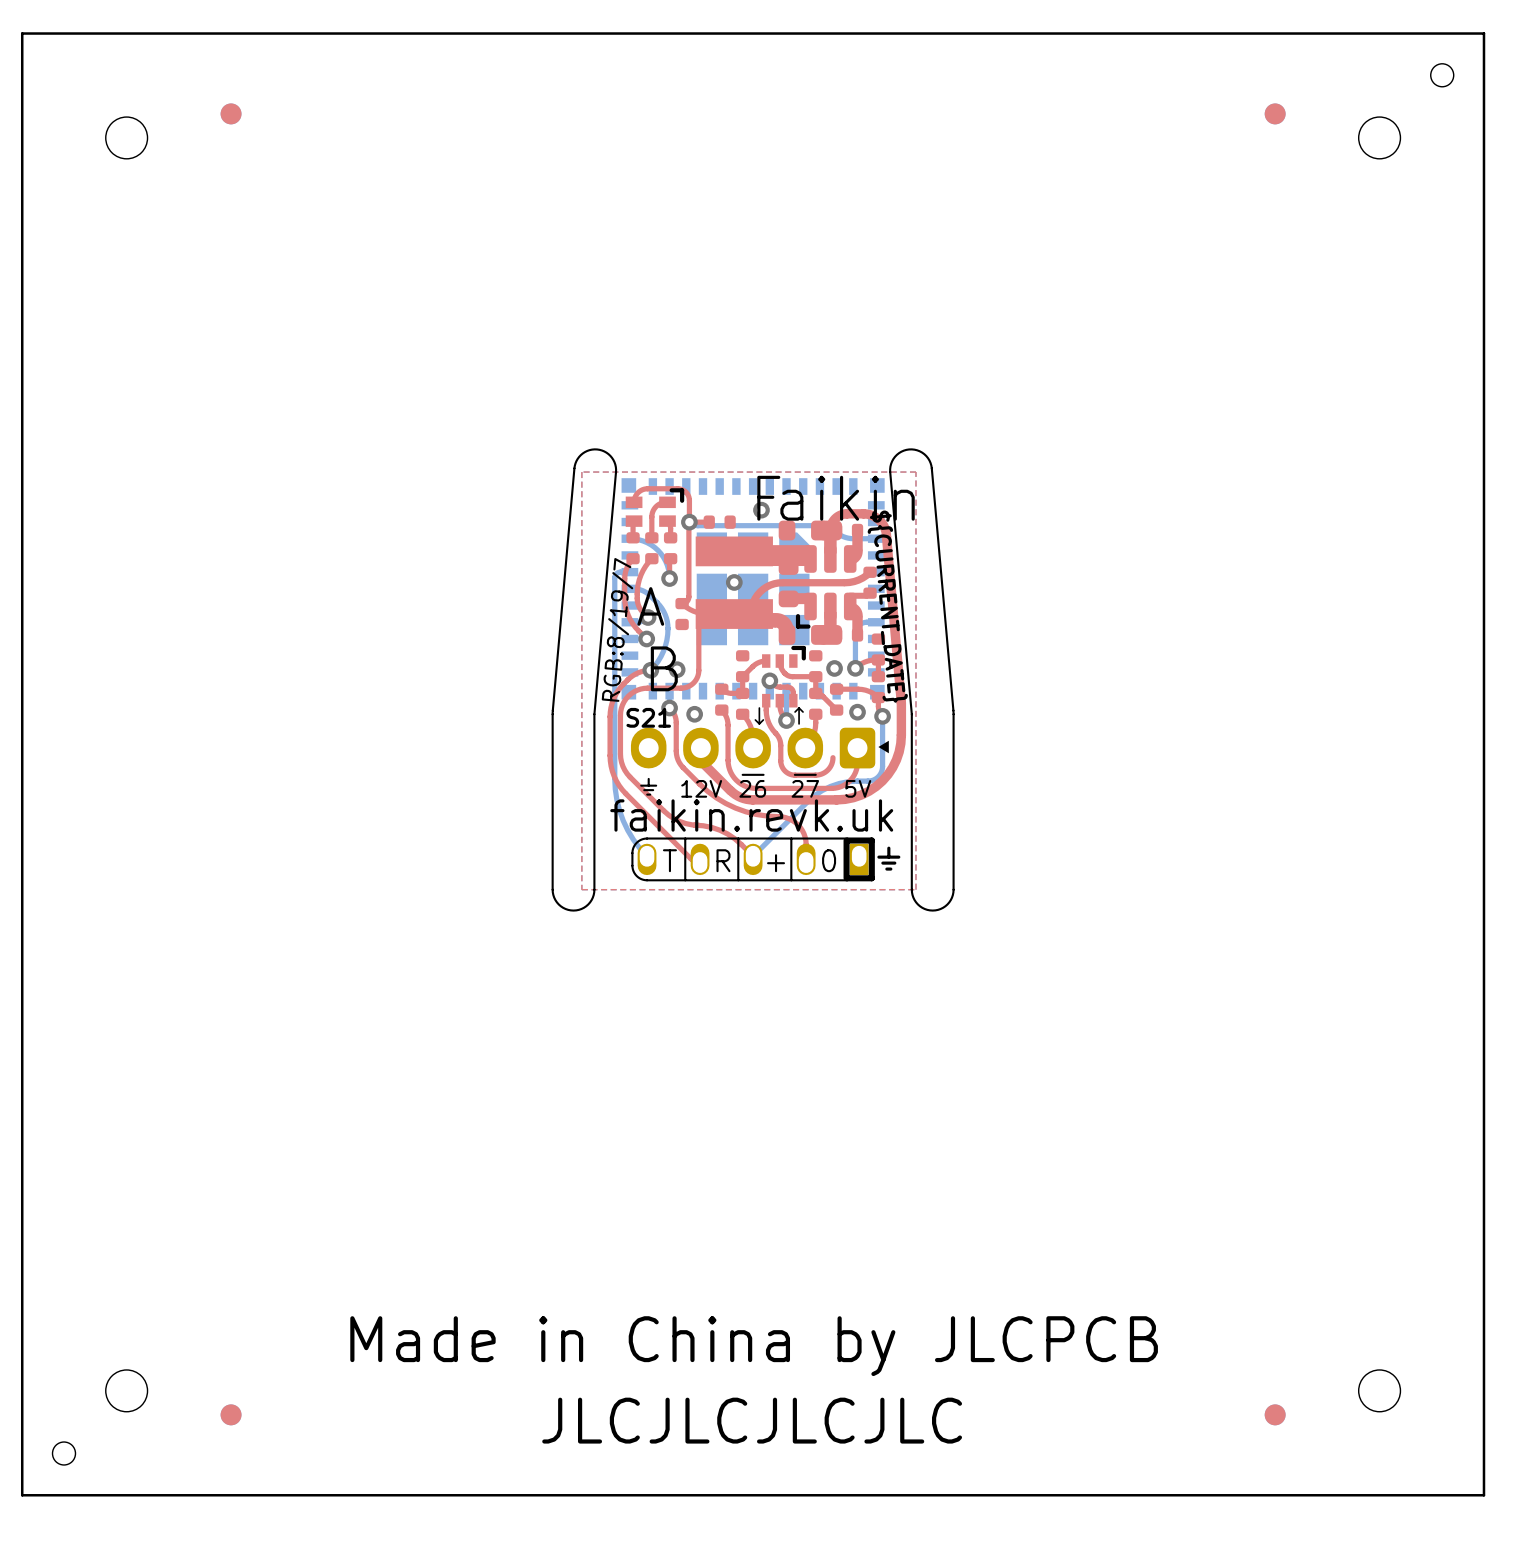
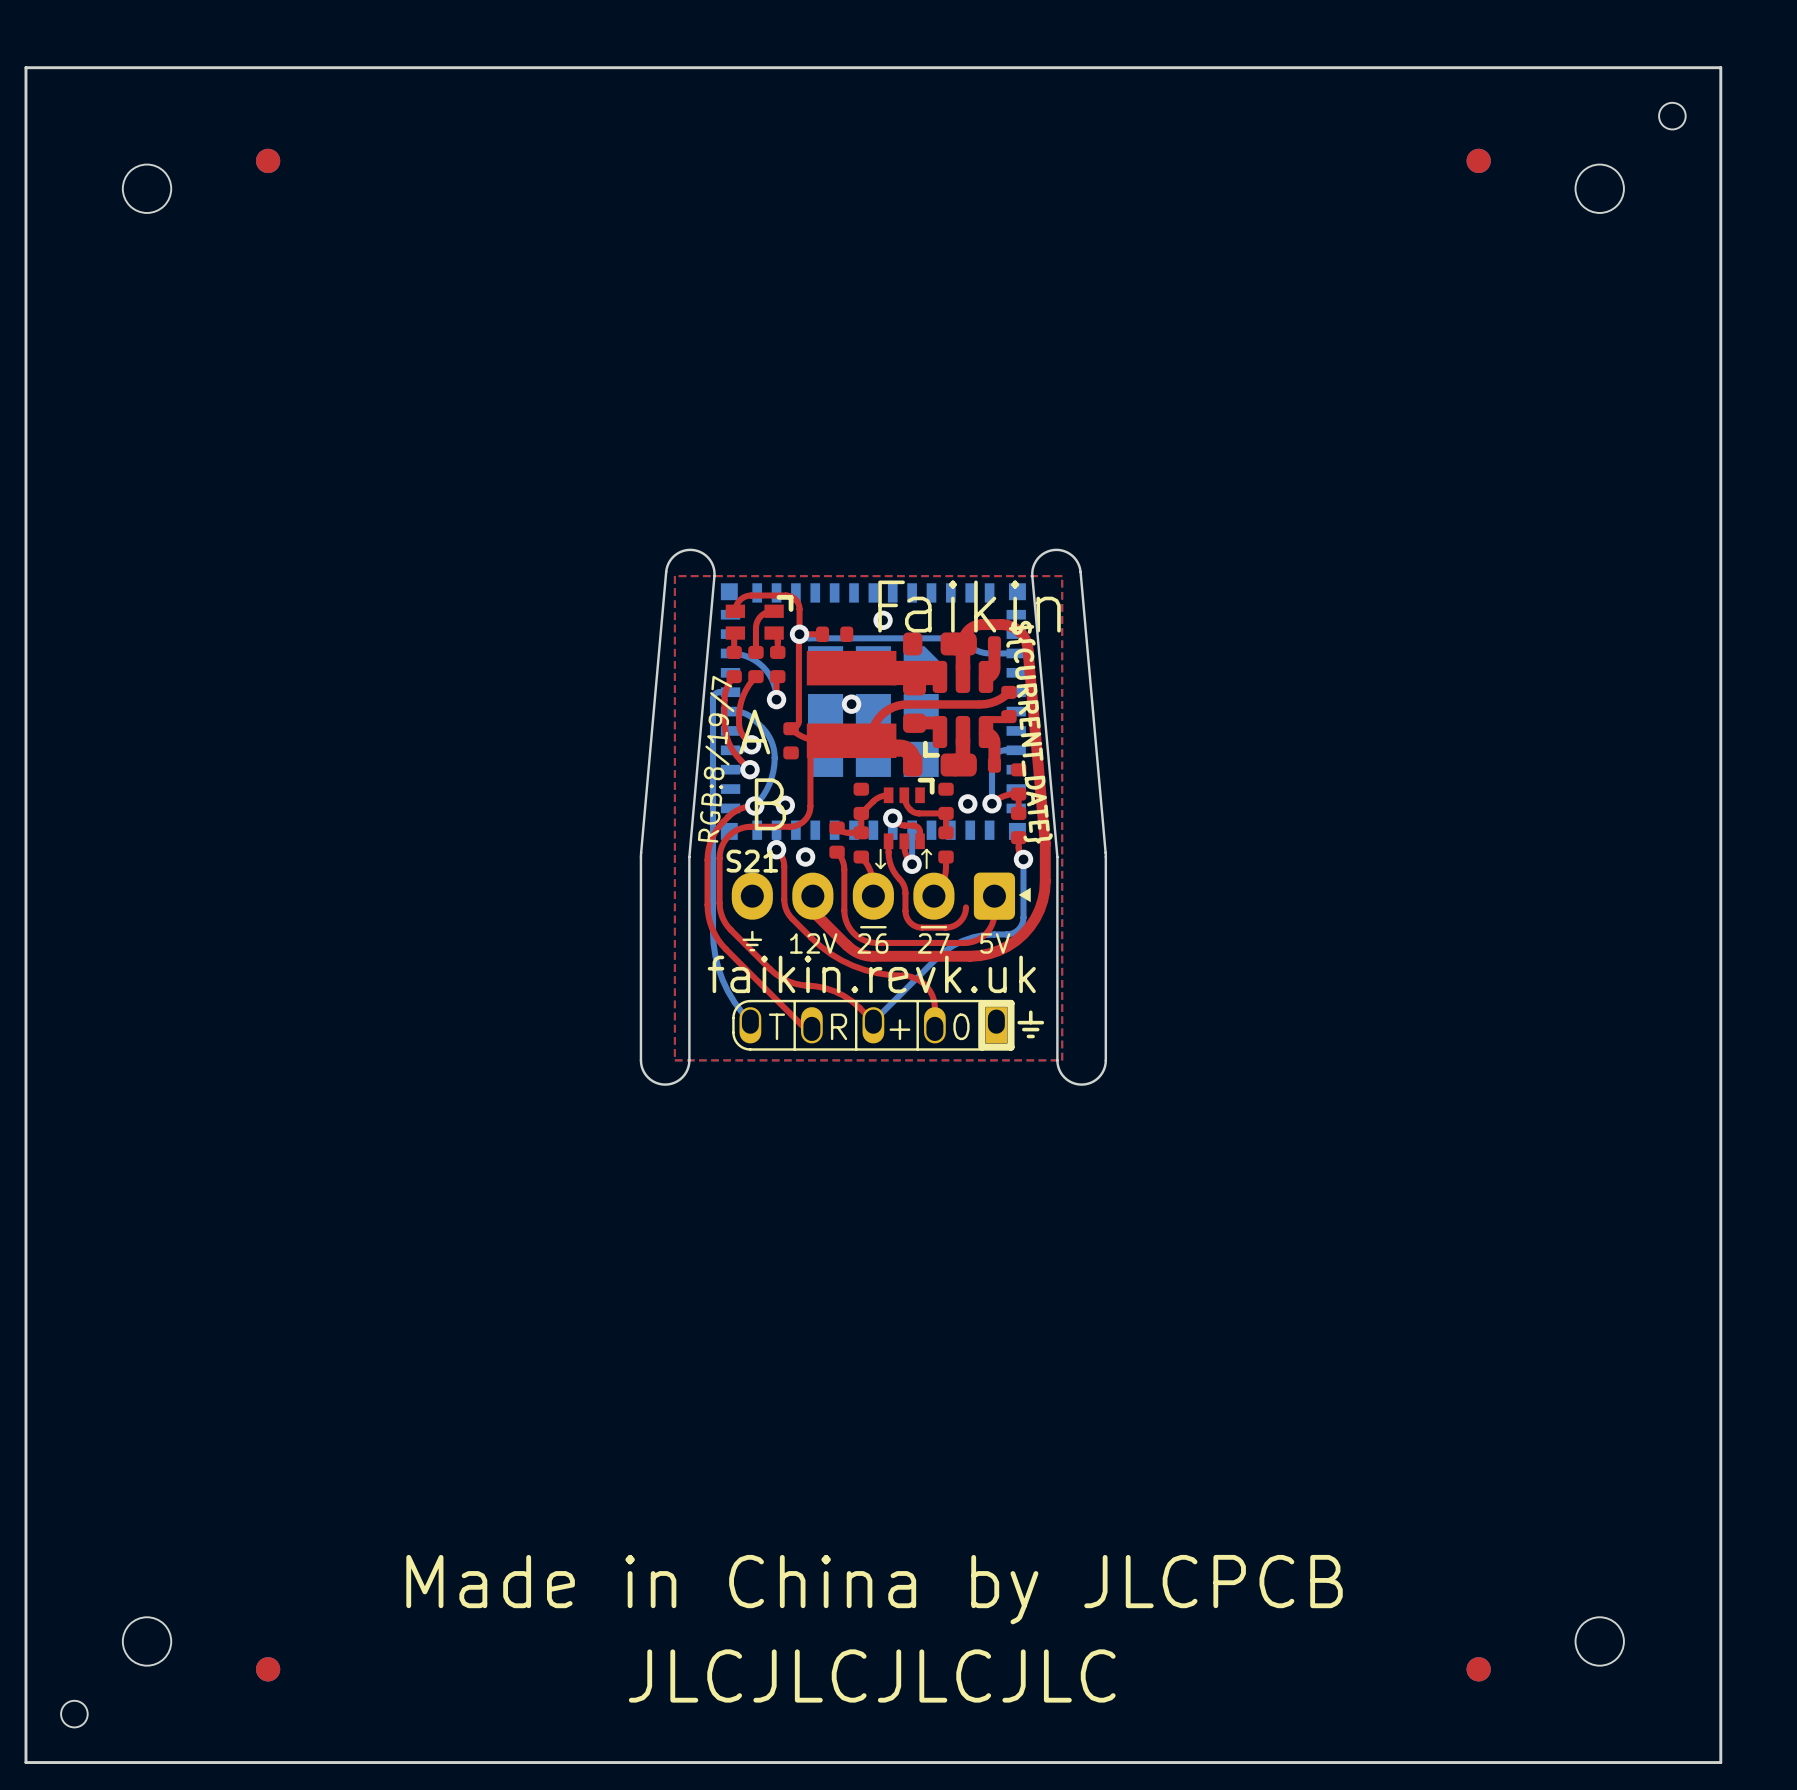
top track: (836, 689) (858, 689) -> none
top track: (858, 689) (869, 691) (878, 697) -> none
top track: (815, 693) (821, 695) (836, 710) -> none
part: (836, 699) -> none
via: (857, 712) -> none

